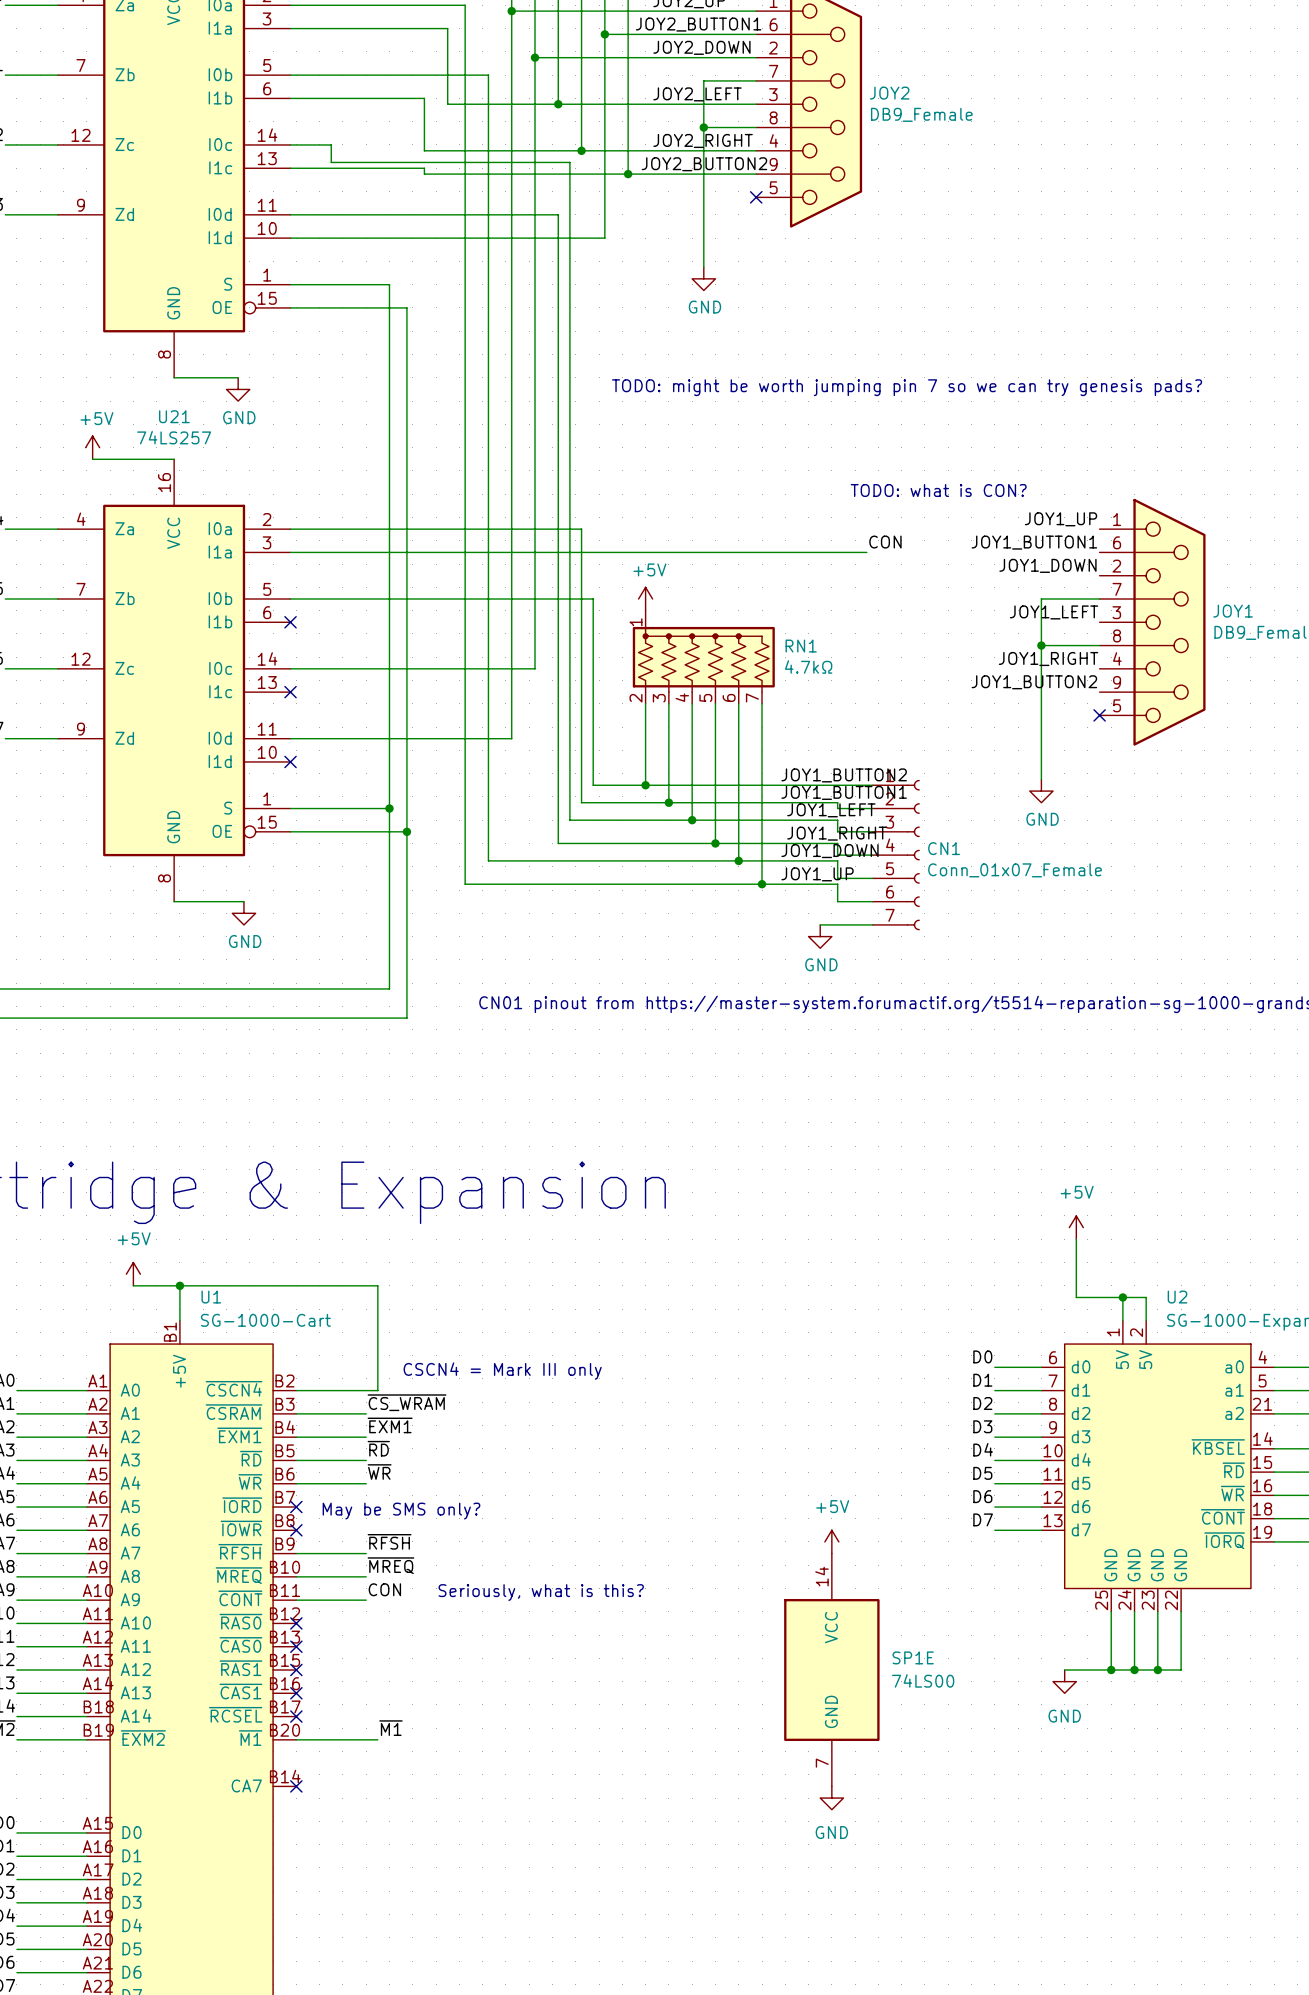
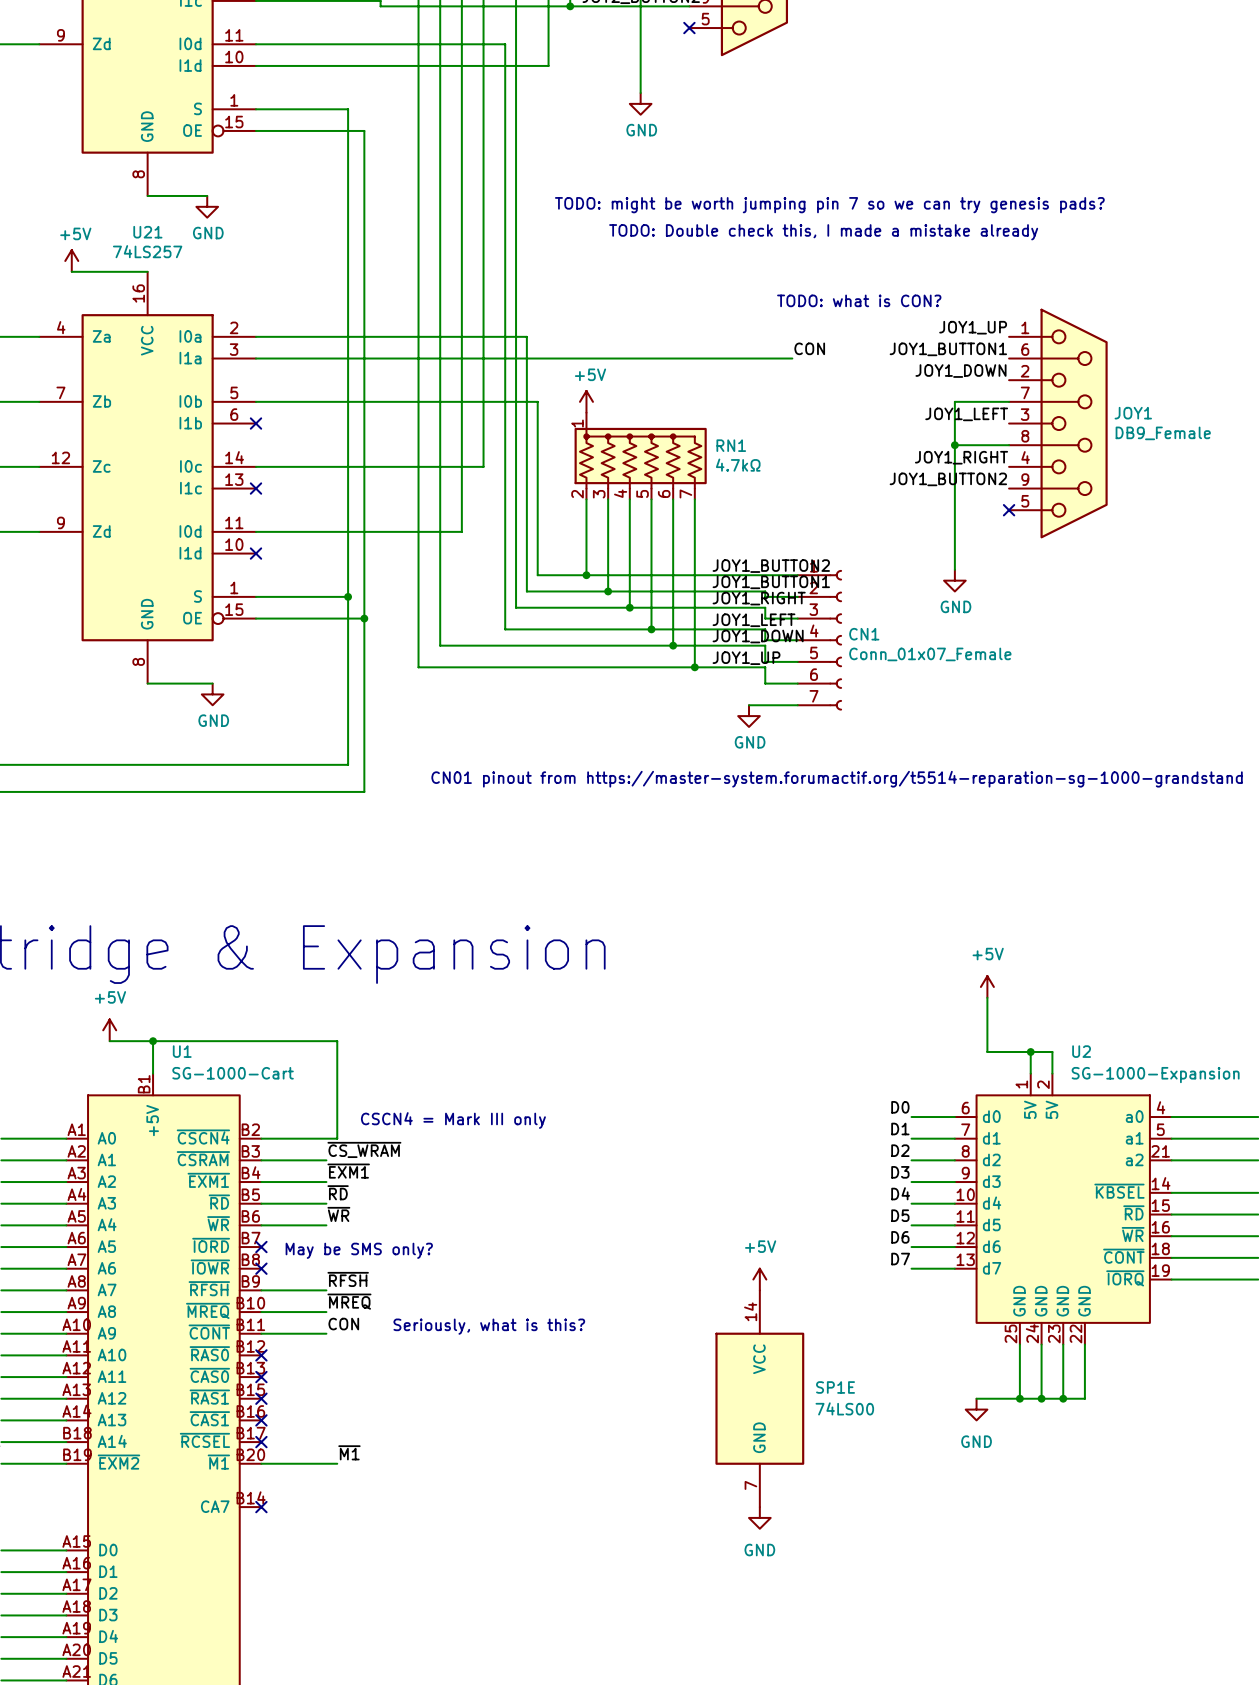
text: none -> TODO: Double check this, I made a mistake already (823, 232)
label: JOY1_LEFT (831, 810) -> JOY1_RIGHT (759, 598)
label: JOY1_RIGHT (836, 833) -> JOY1_LEFT (753, 620)

